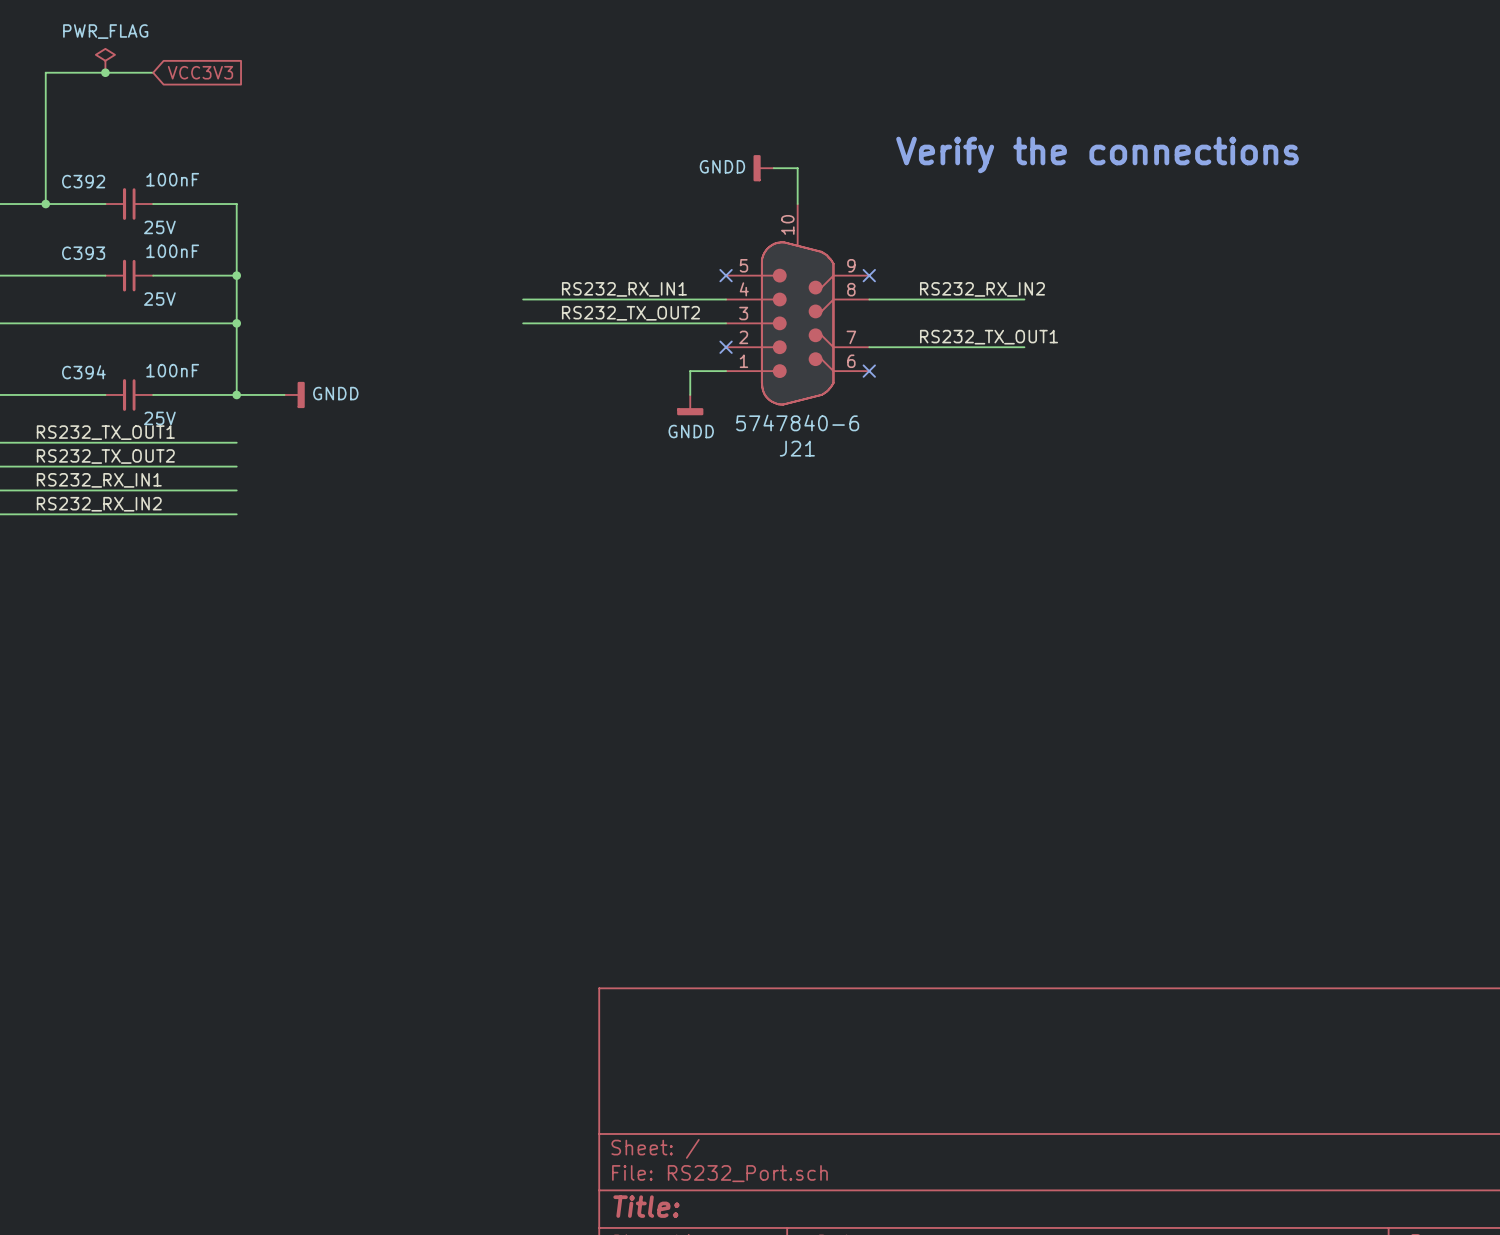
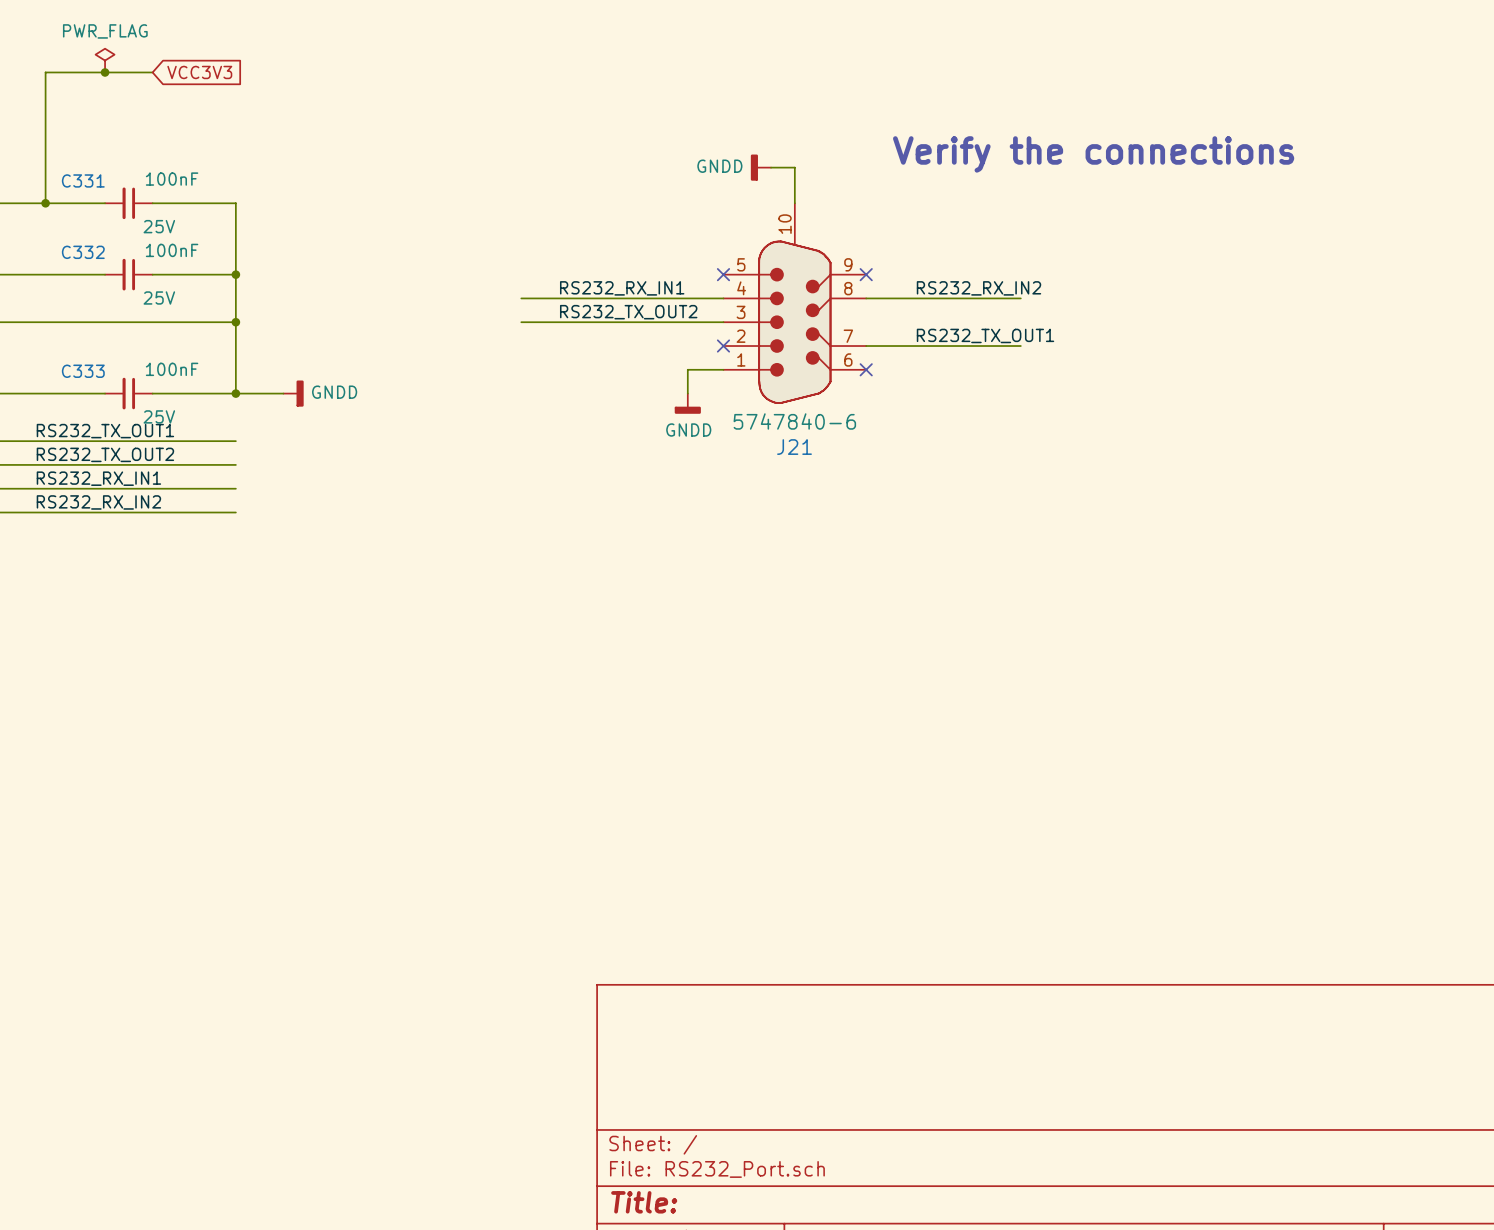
C392 name: C392 (83, 181) -> C331 (83, 180)
C393 name: C393 (83, 253) -> C332 (83, 252)
C394 name: C394 (83, 372) -> C333 (83, 371)

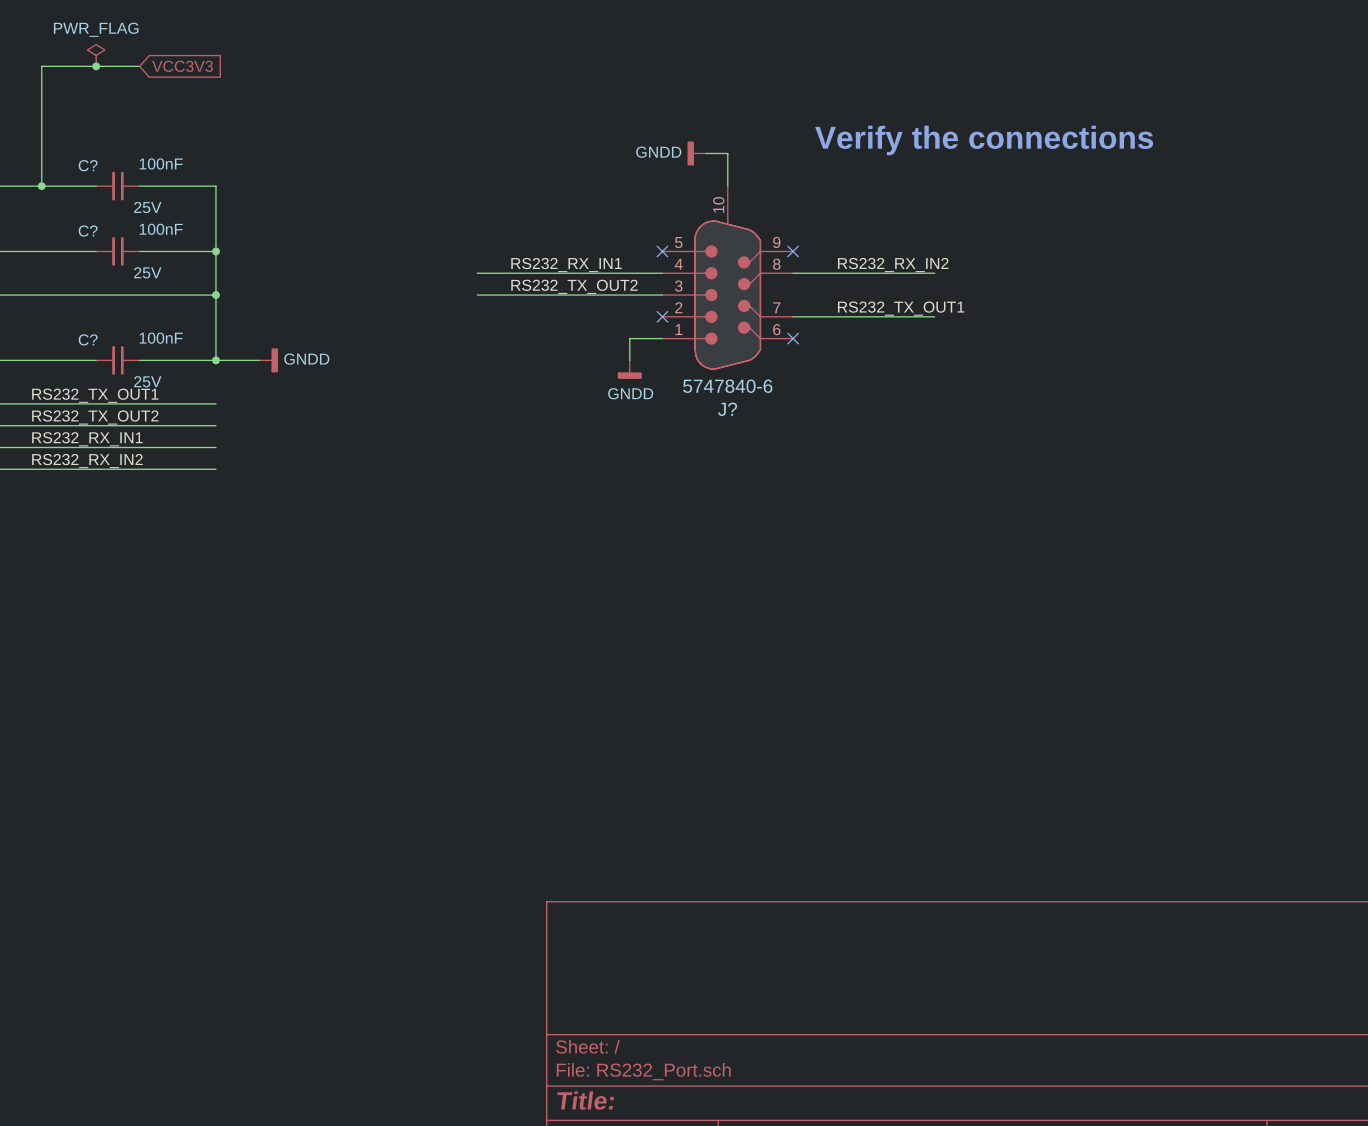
C331 name: C331 (83, 180) -> C? (88, 165)
C332 name: C332 (83, 252) -> C? (88, 231)
C333 name: C333 (83, 371) -> C? (88, 339)
J21 name: J21 (794, 447) -> J? (727, 409)

